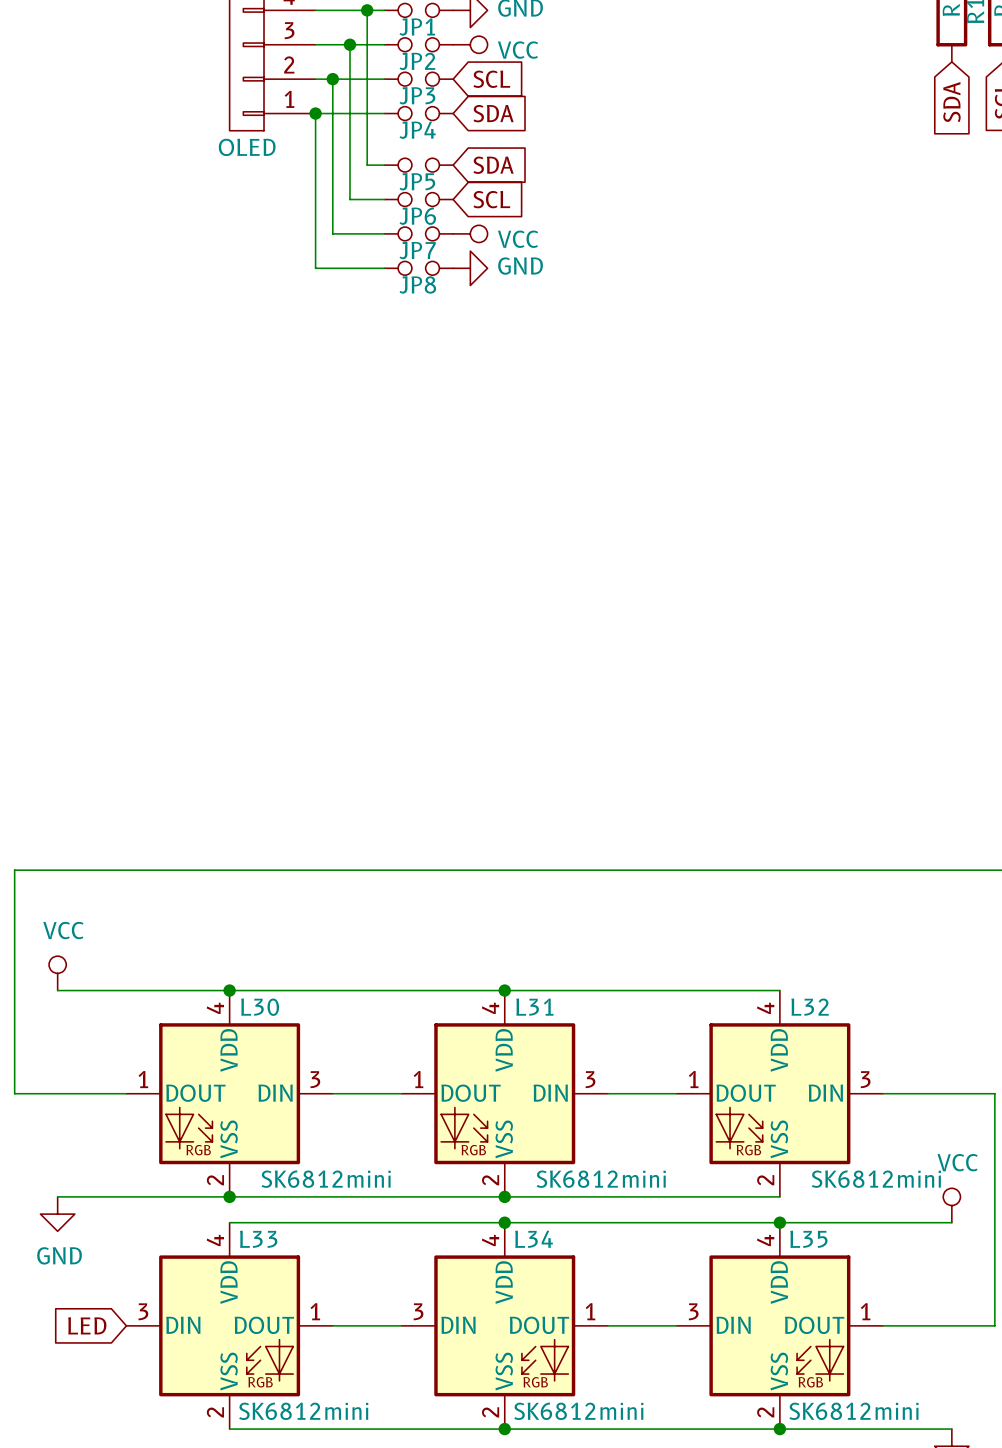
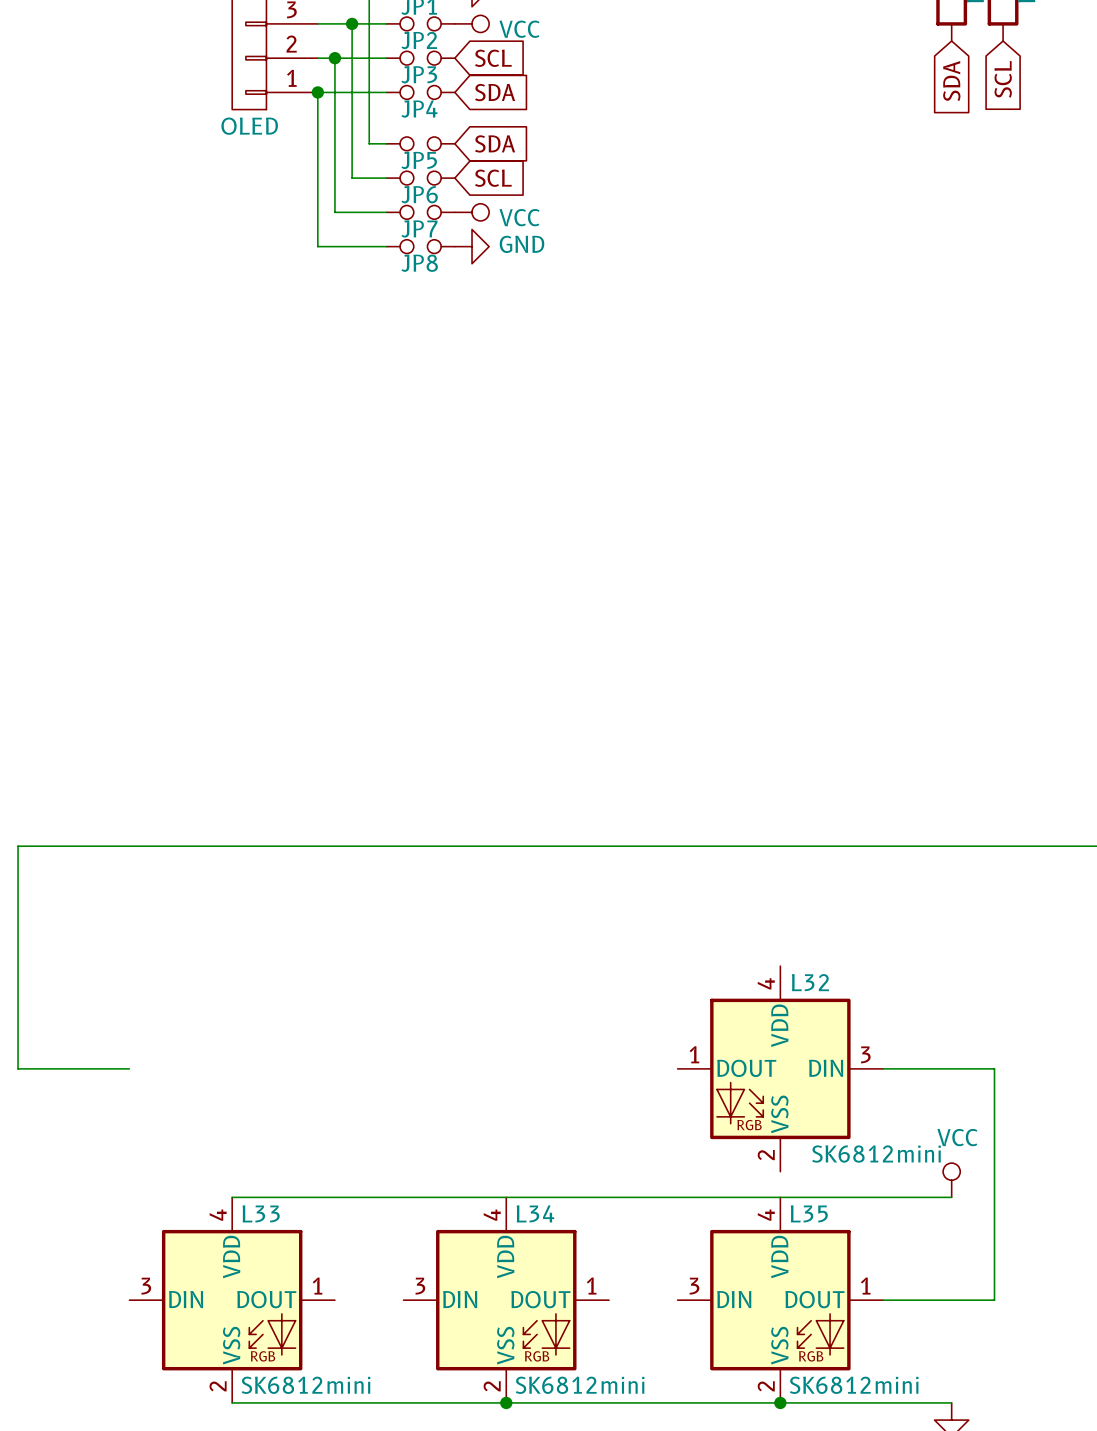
power symbol: VCC (57, 973) -> none
wire: (57, 990) (779, 990) -> none
junction: (229, 990) -> none
junction: (504, 990) -> none
L30: SK6812mini (229, 1093) -> none
wire: (332, 1093) (401, 1093) -> none
L31: SK6812mini (504, 1093) -> none
wire: (607, 1093) (676, 1093) -> none
wire: (57, 1196) (779, 1196) -> none
junction: (229, 1196) -> none
junction: (504, 1196) -> none
power symbol: GND (57, 1214) -> none
junction: (504, 1222) -> none
junction: (779, 1222) -> none
global label: LED (87, 1325) -> none
wire: (332, 1325) (401, 1325) -> none
wire: (607, 1325) (676, 1325) -> none

